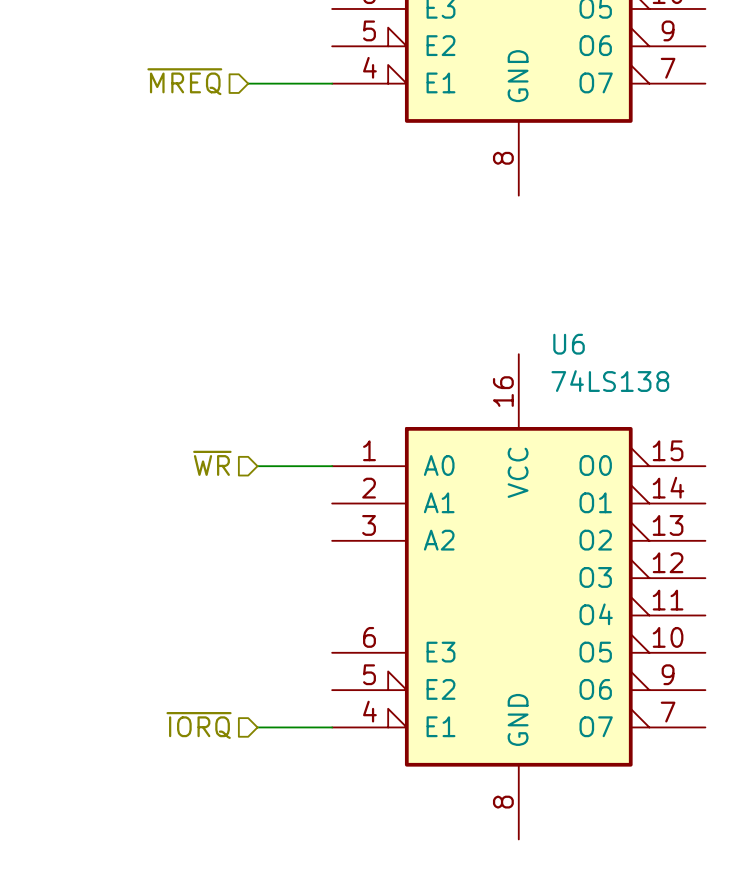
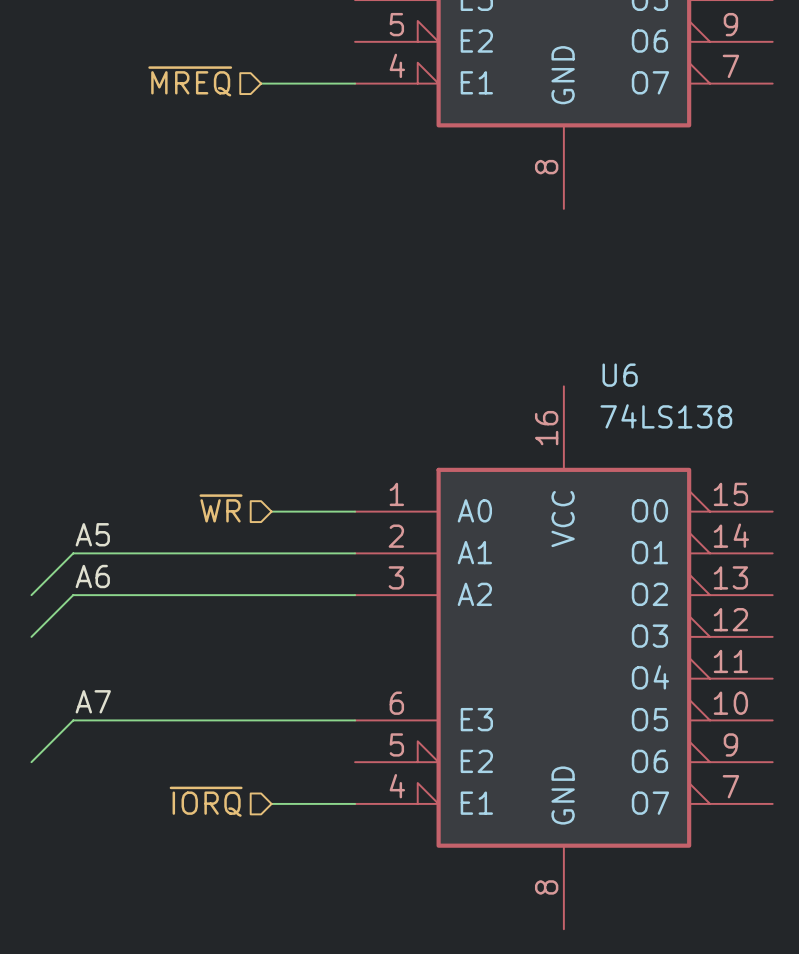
label: none -> A5 (92, 534)
wire: none -> (73, 553) (31, 595)
wire: none -> (73, 553) (355, 553)
label: none -> A6 (92, 576)
wire: none -> (355, 595) (73, 595) (31, 636)
label: none -> A7 (93, 701)
wire: none -> (355, 720) (73, 720) (31, 762)

